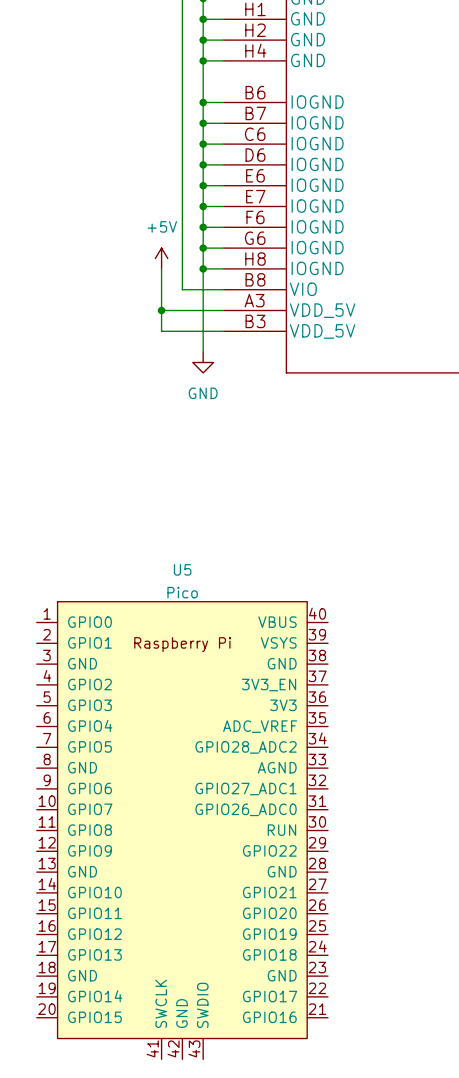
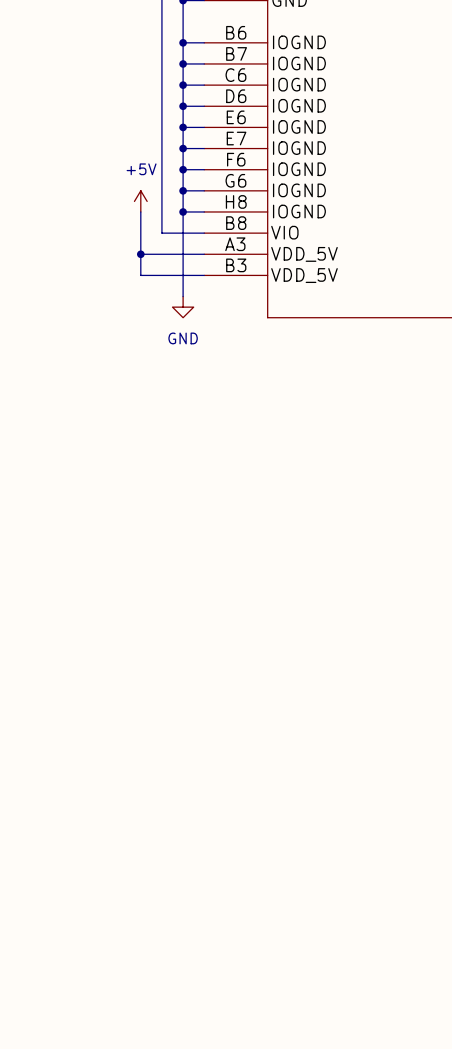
U5: Pico (182, 830) -> none

